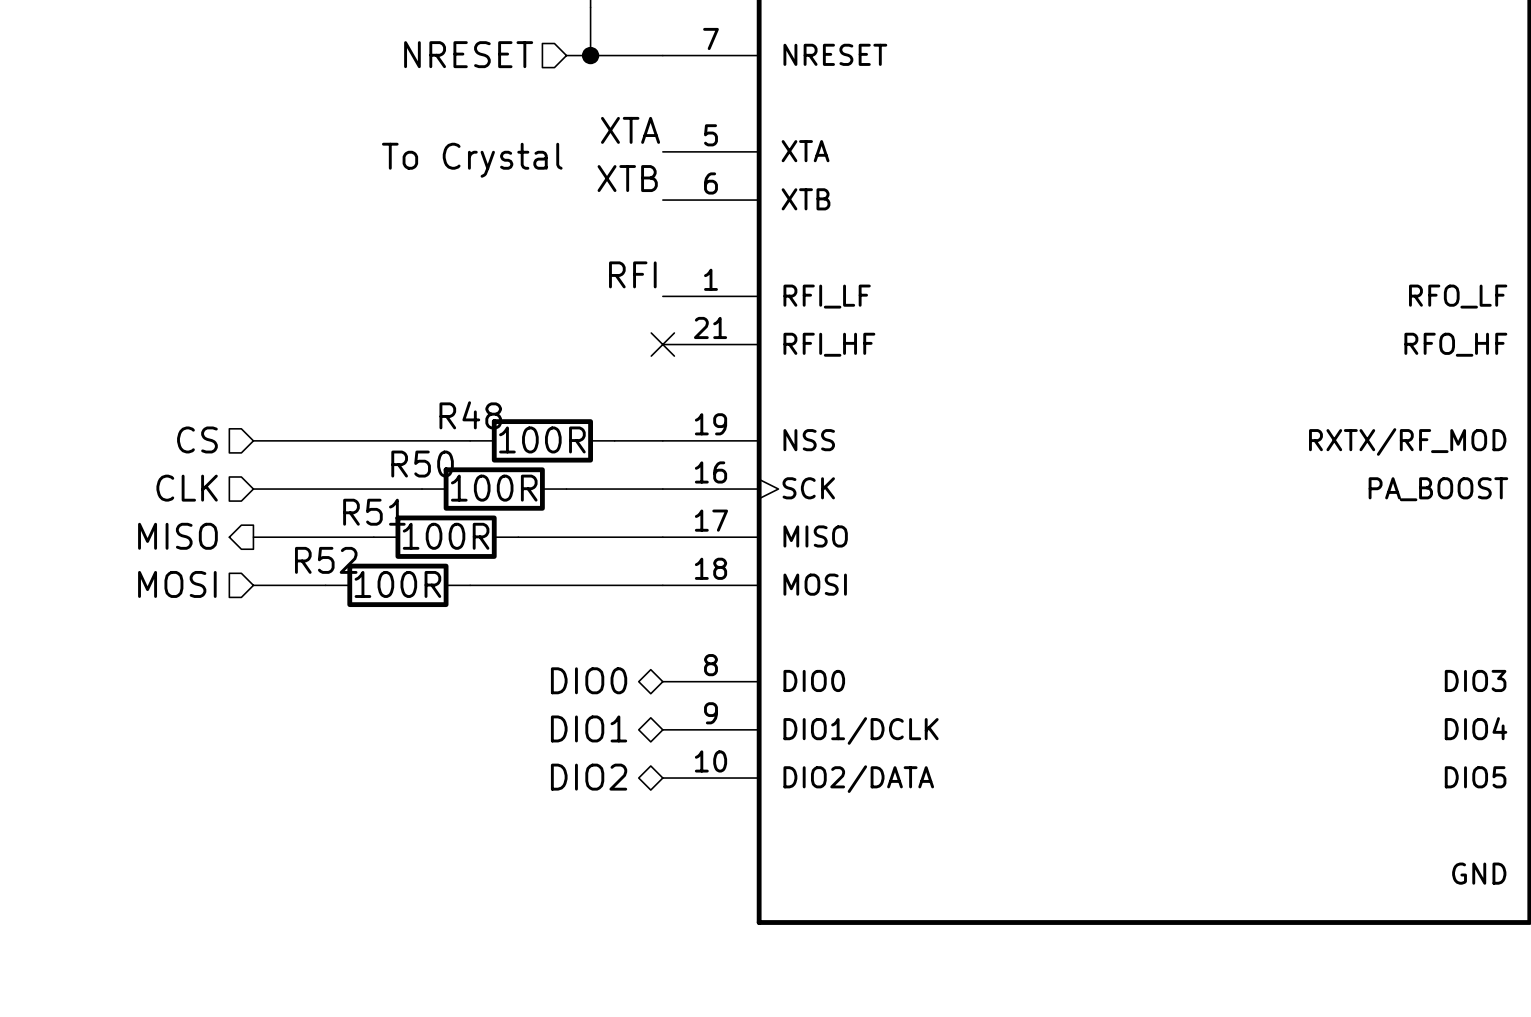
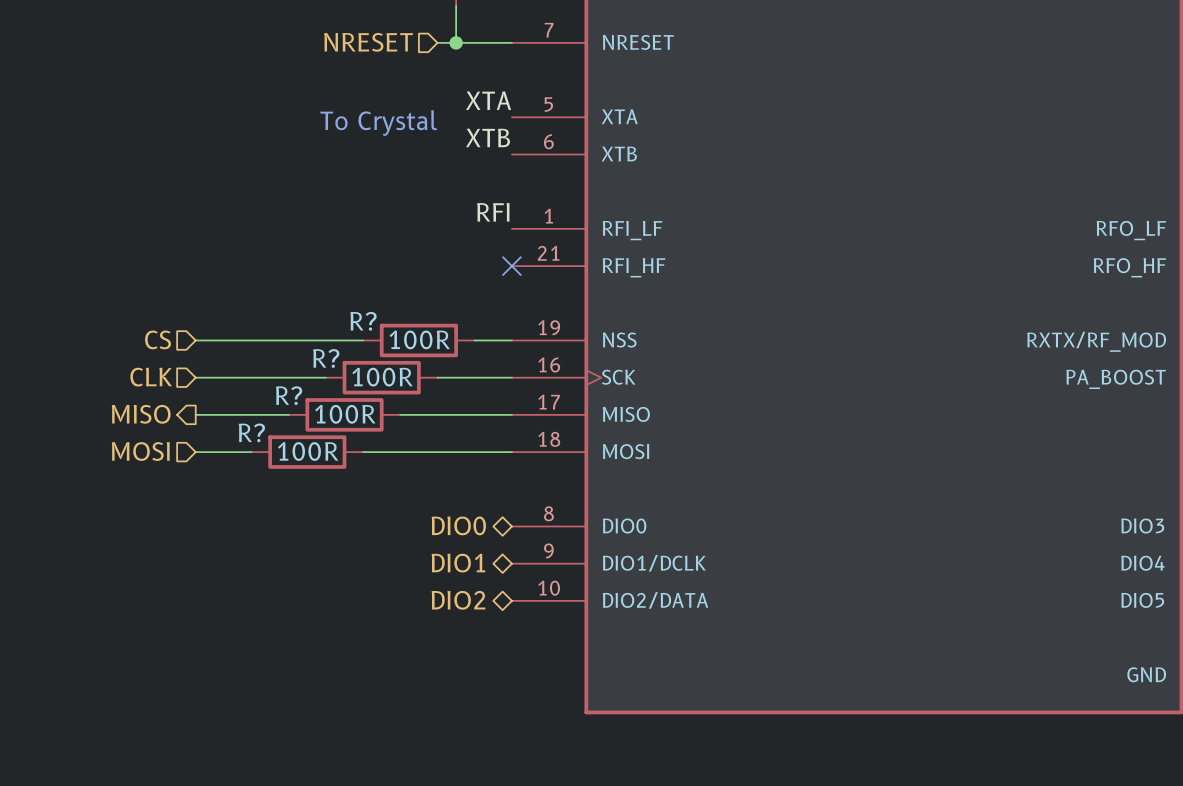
R48 name: R48 (470, 415) -> R? (363, 321)
R50 name: R50 (422, 464) -> R? (326, 358)
R51 name: R51 (374, 512) -> R? (289, 395)
R52 name: R52 (326, 560) -> R? (251, 432)

